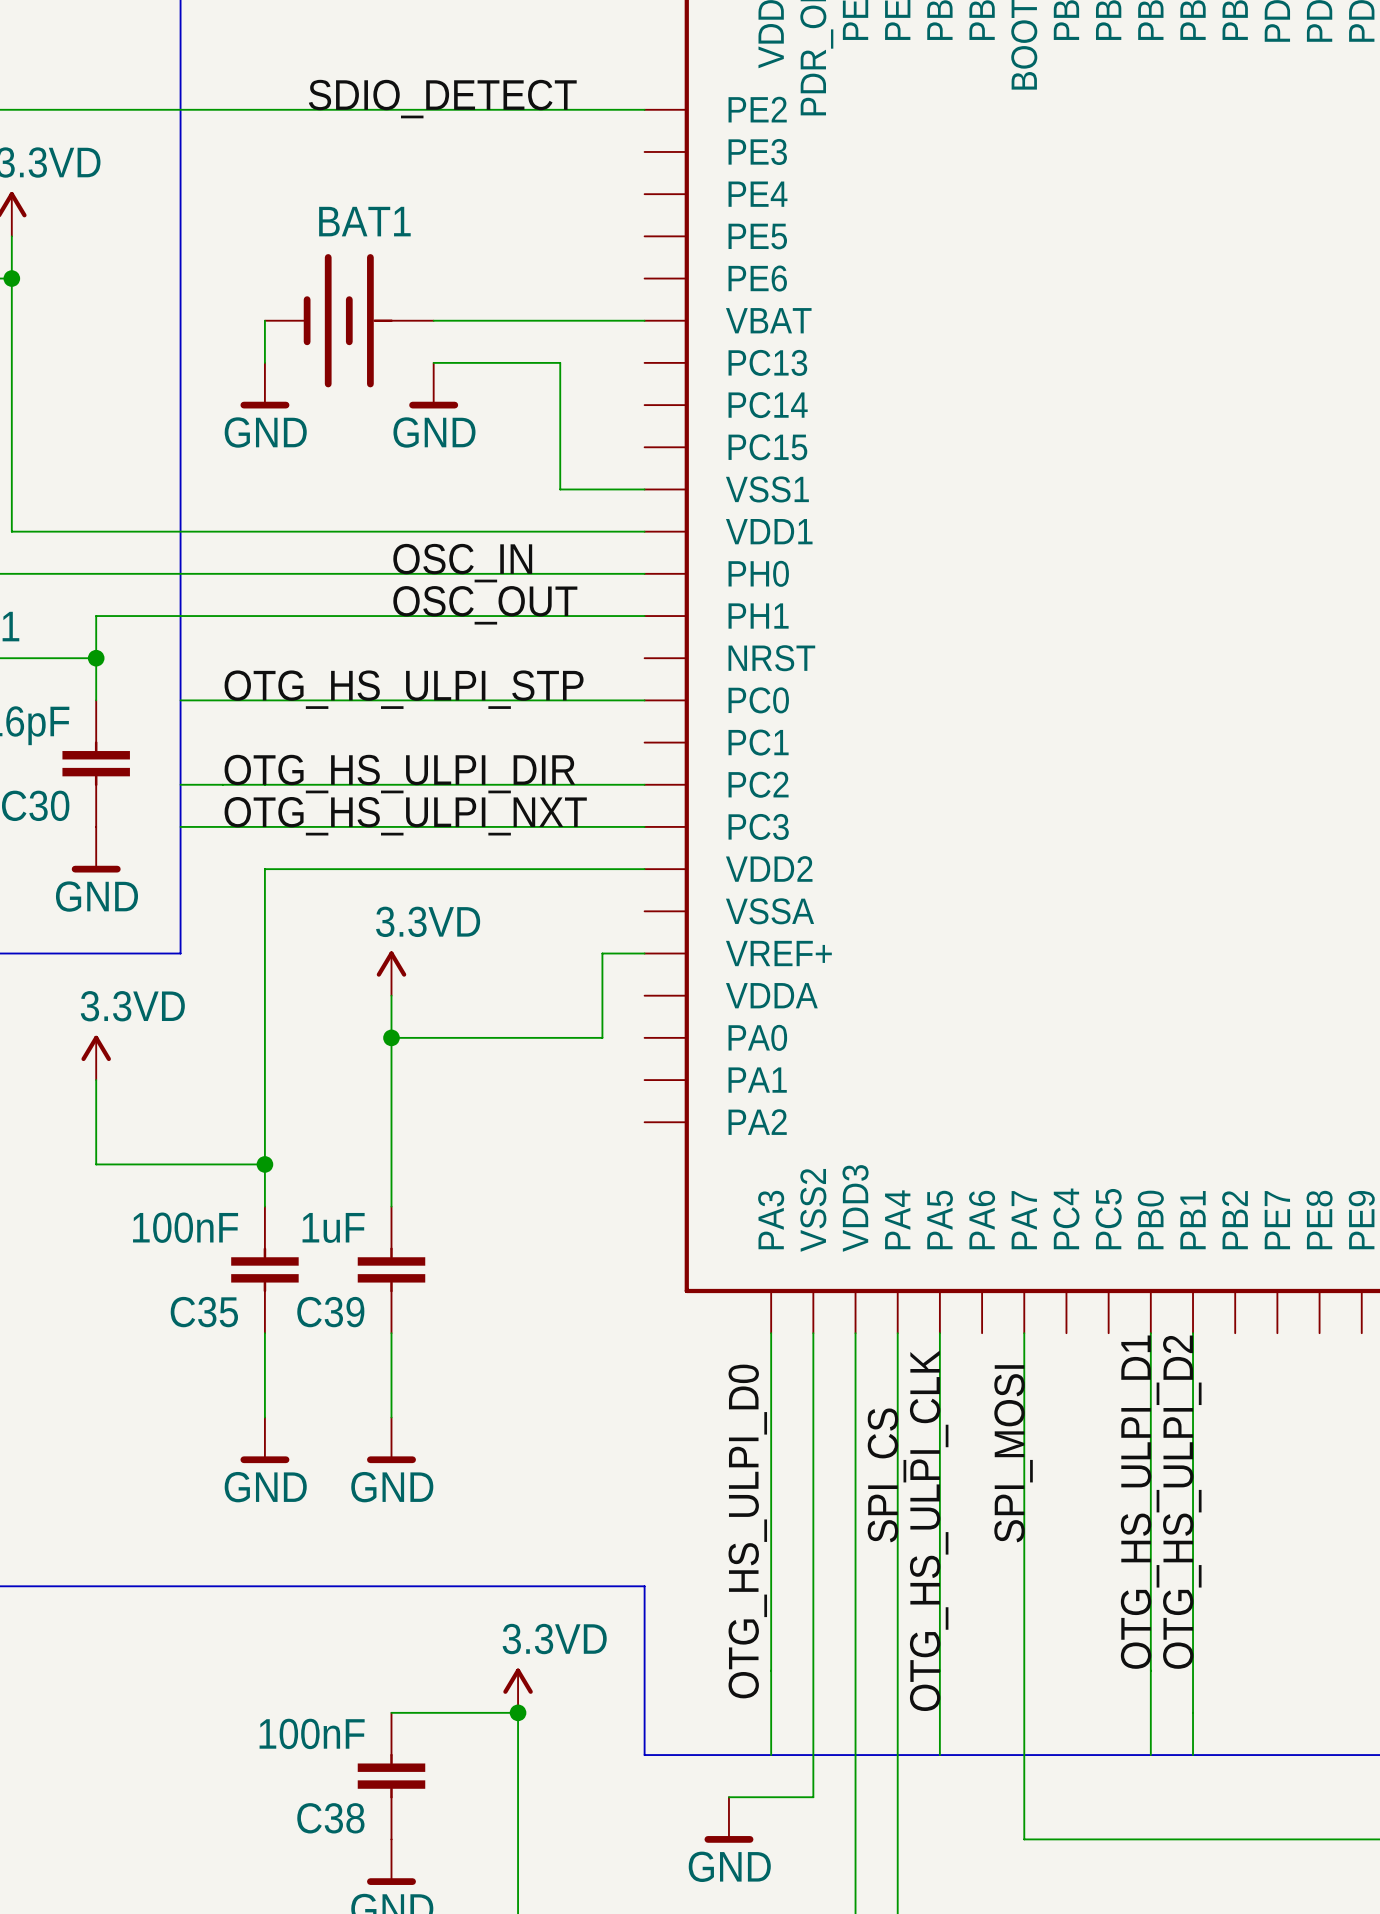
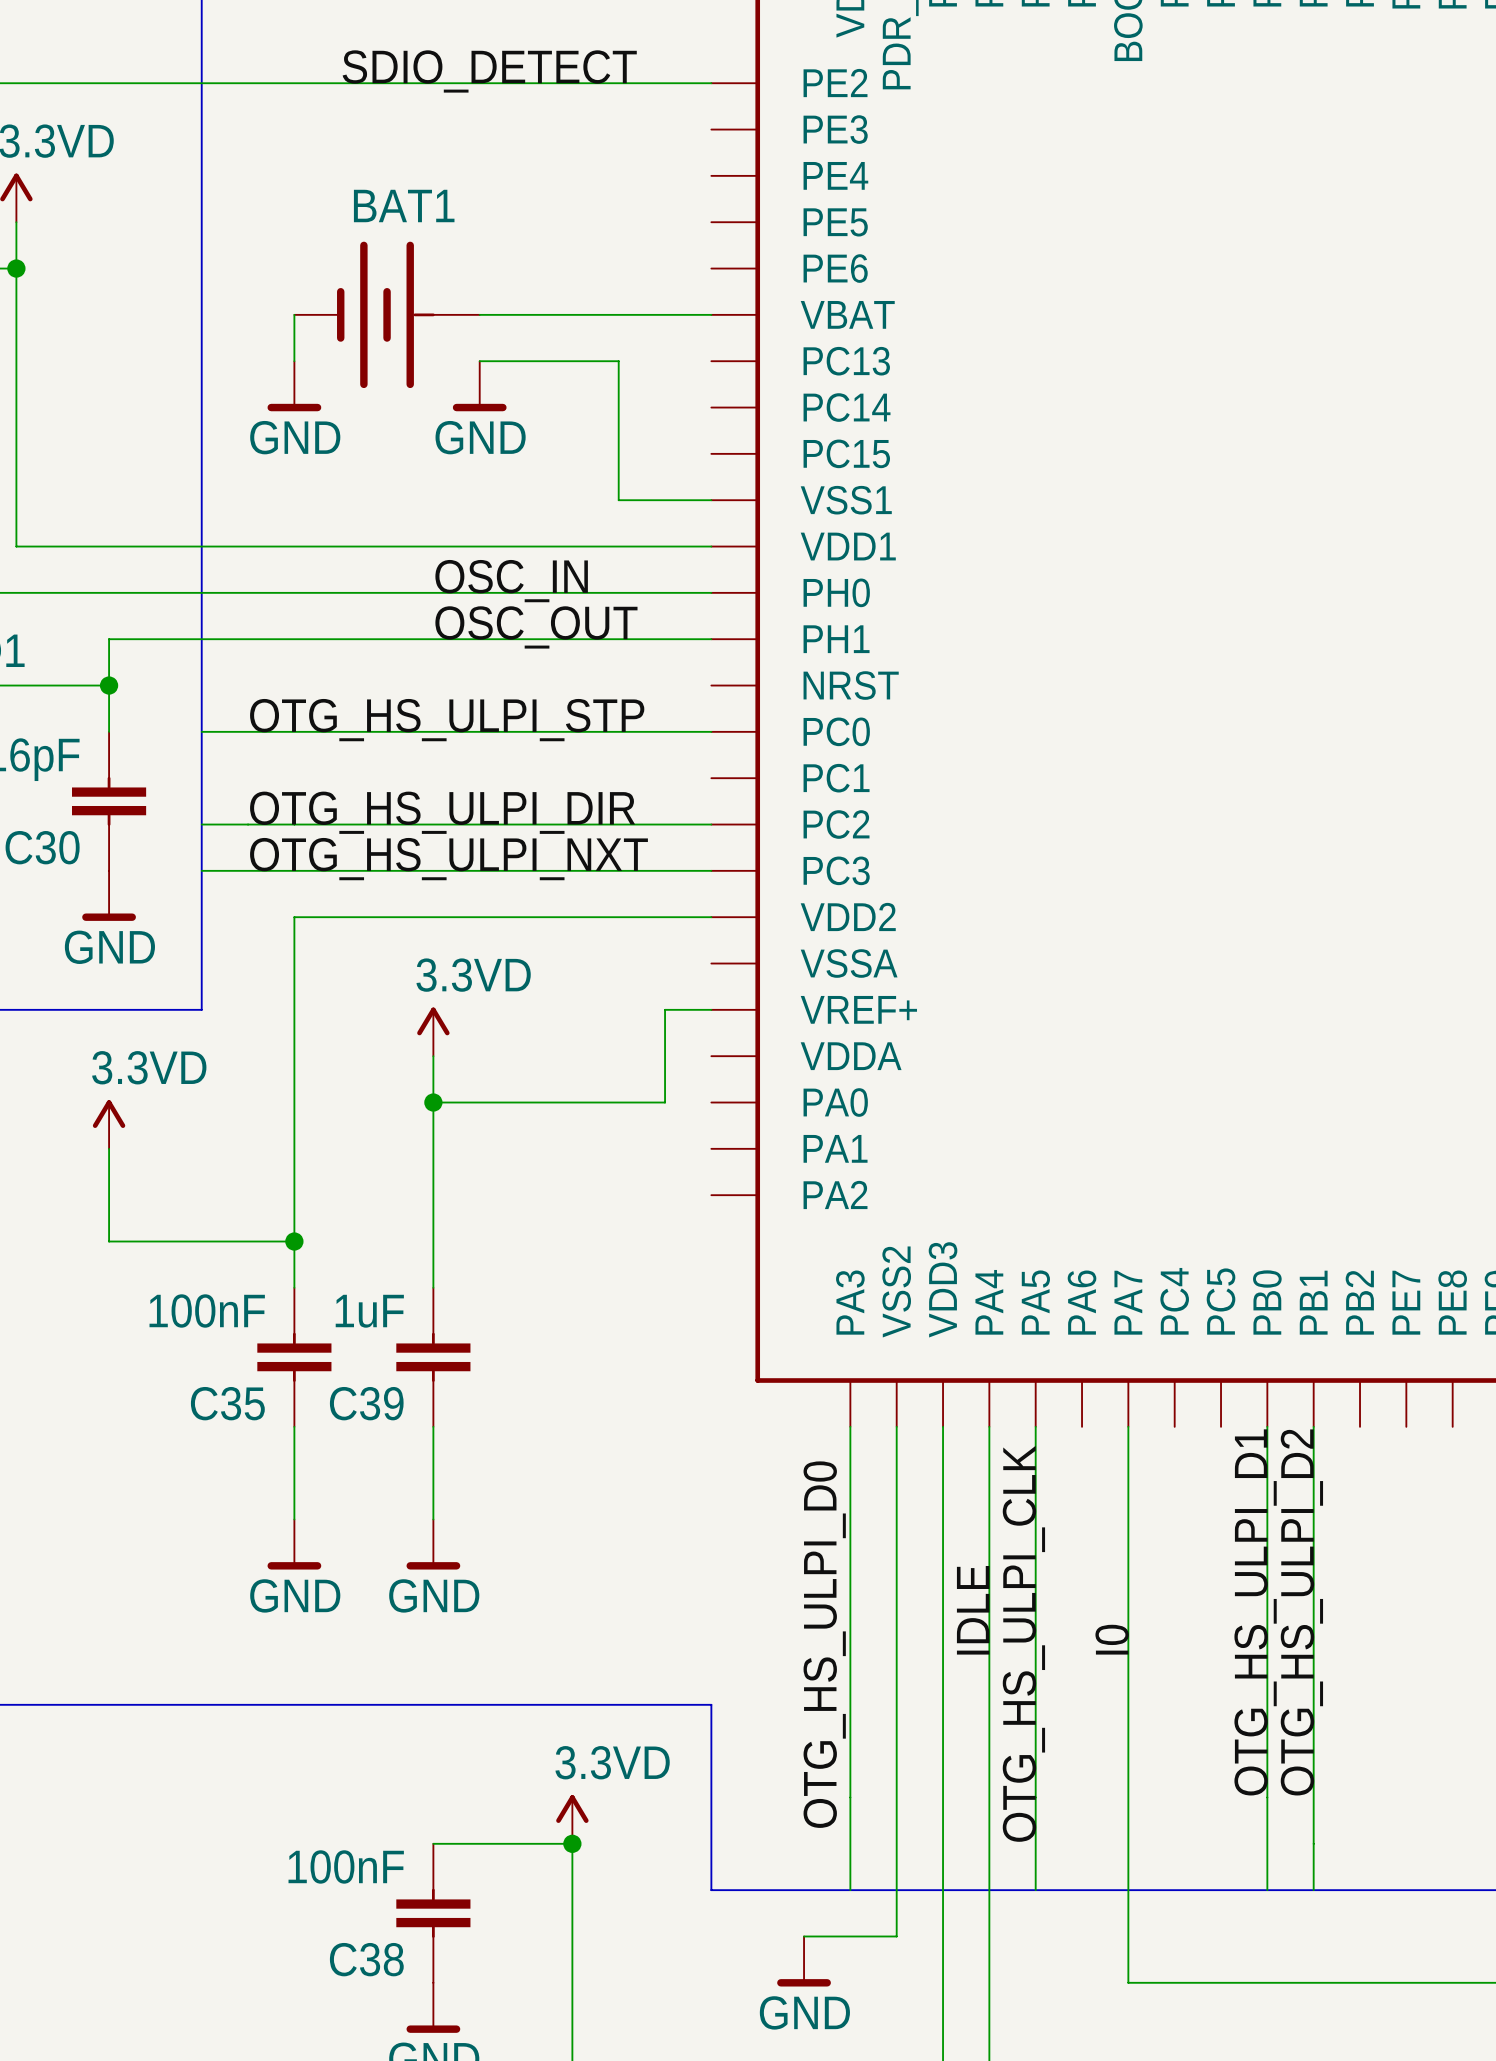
label: SPI_MOSI (1013, 1453) -> I0 (1112, 1639)
label: SPI_CS (887, 1475) -> IDLE (973, 1610)

